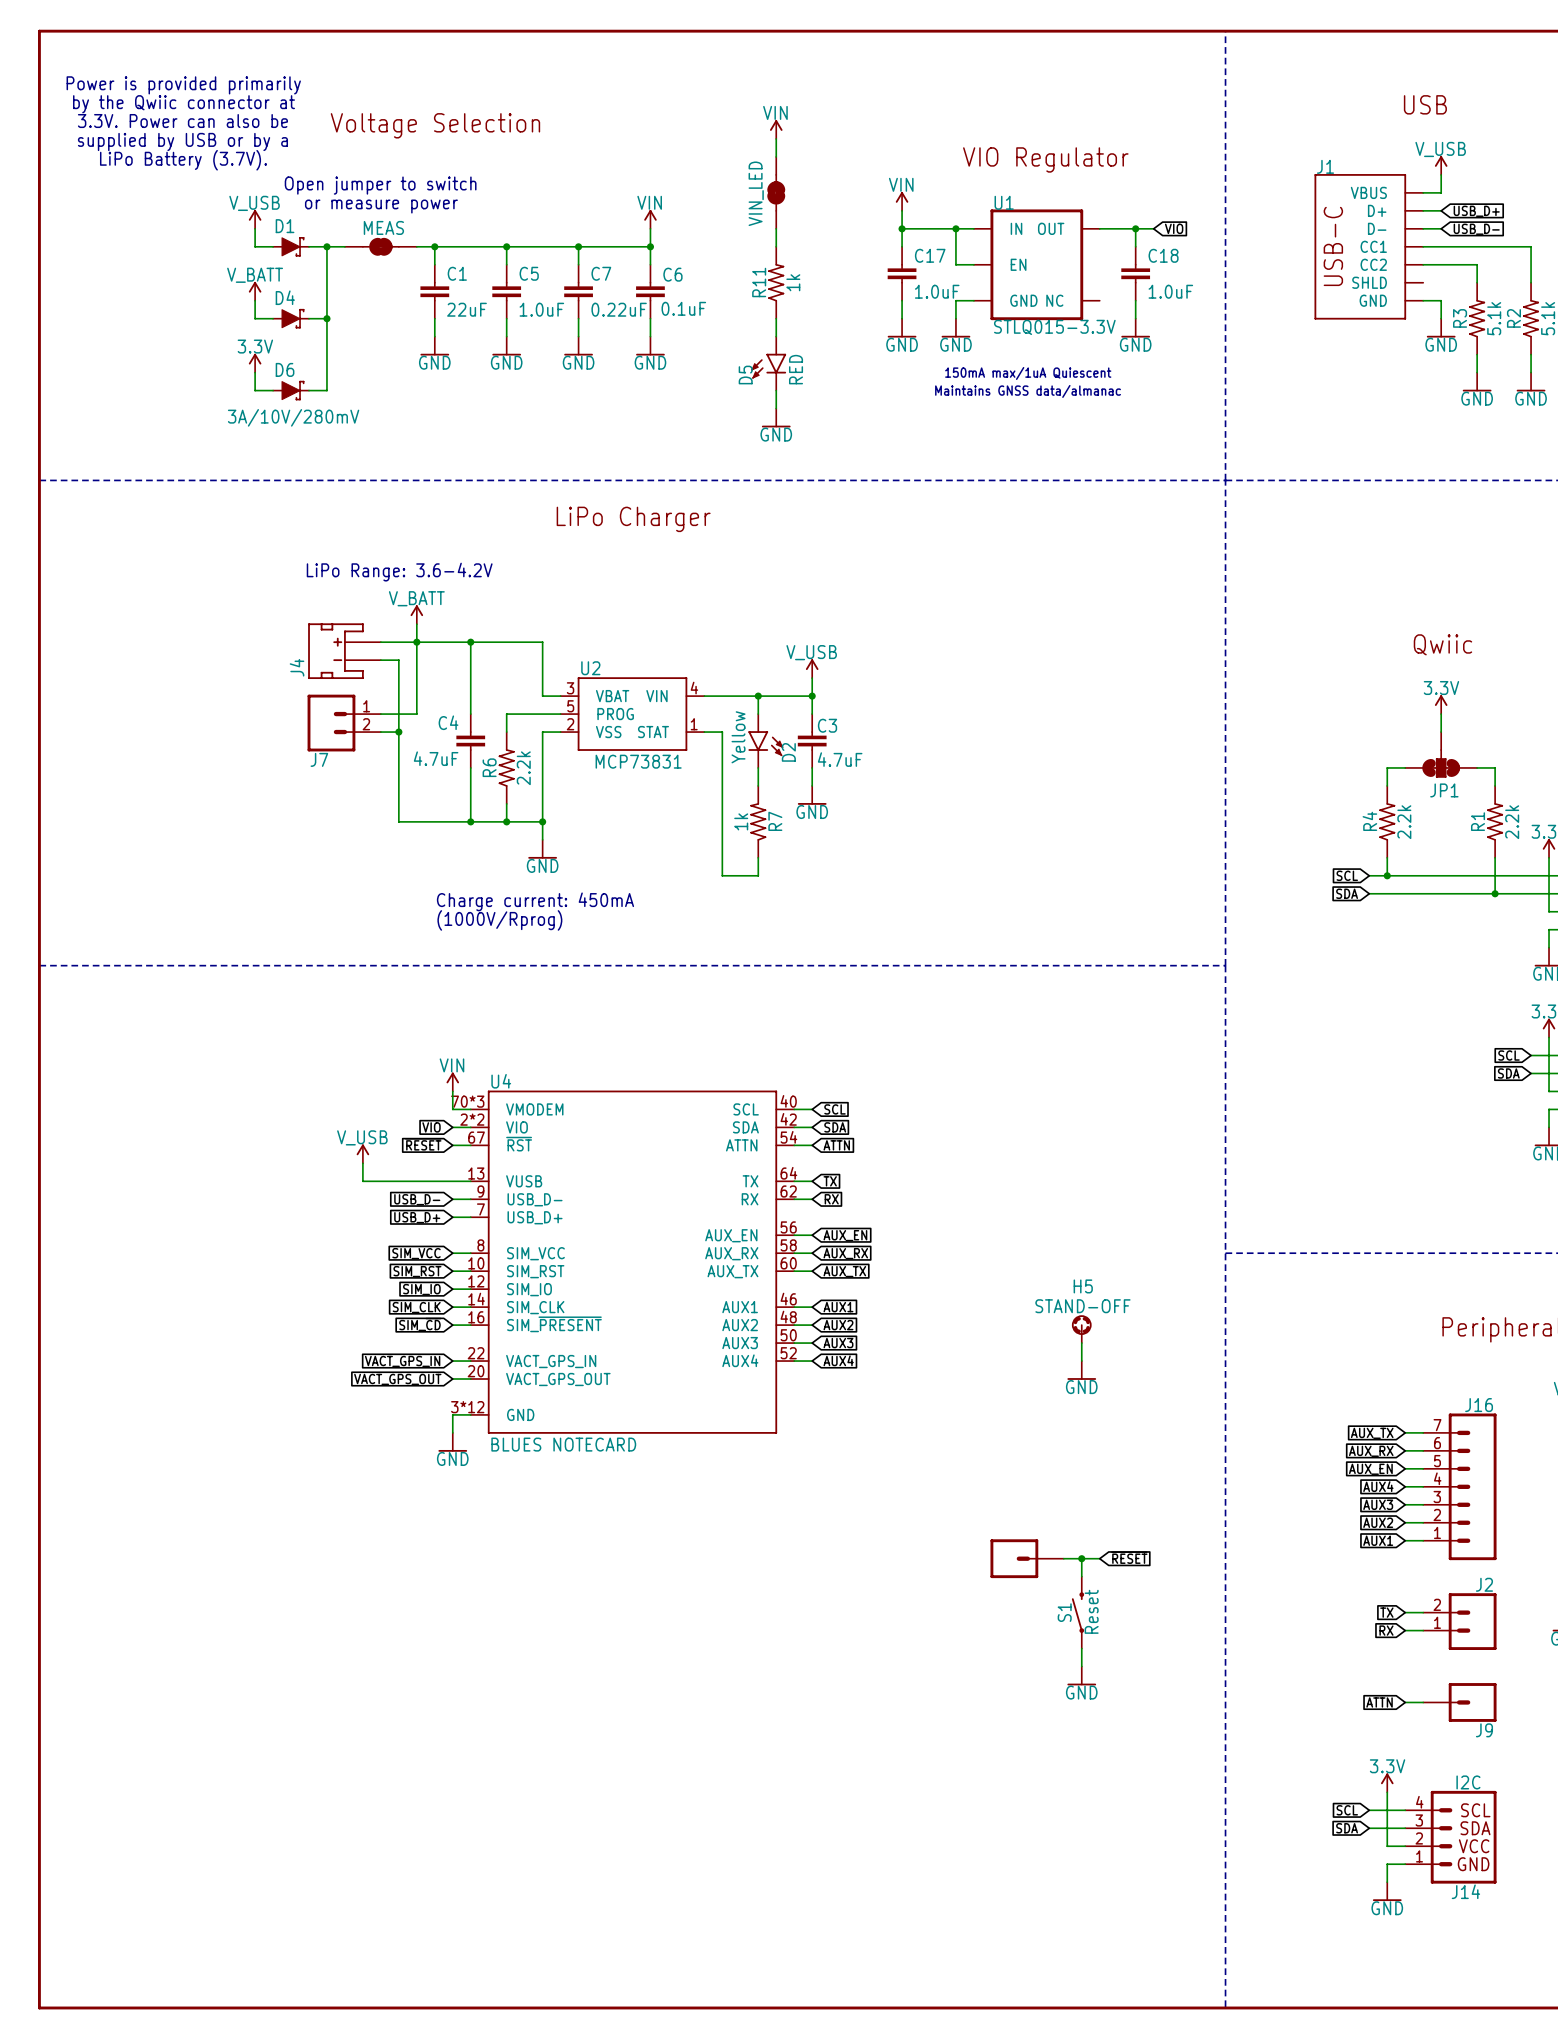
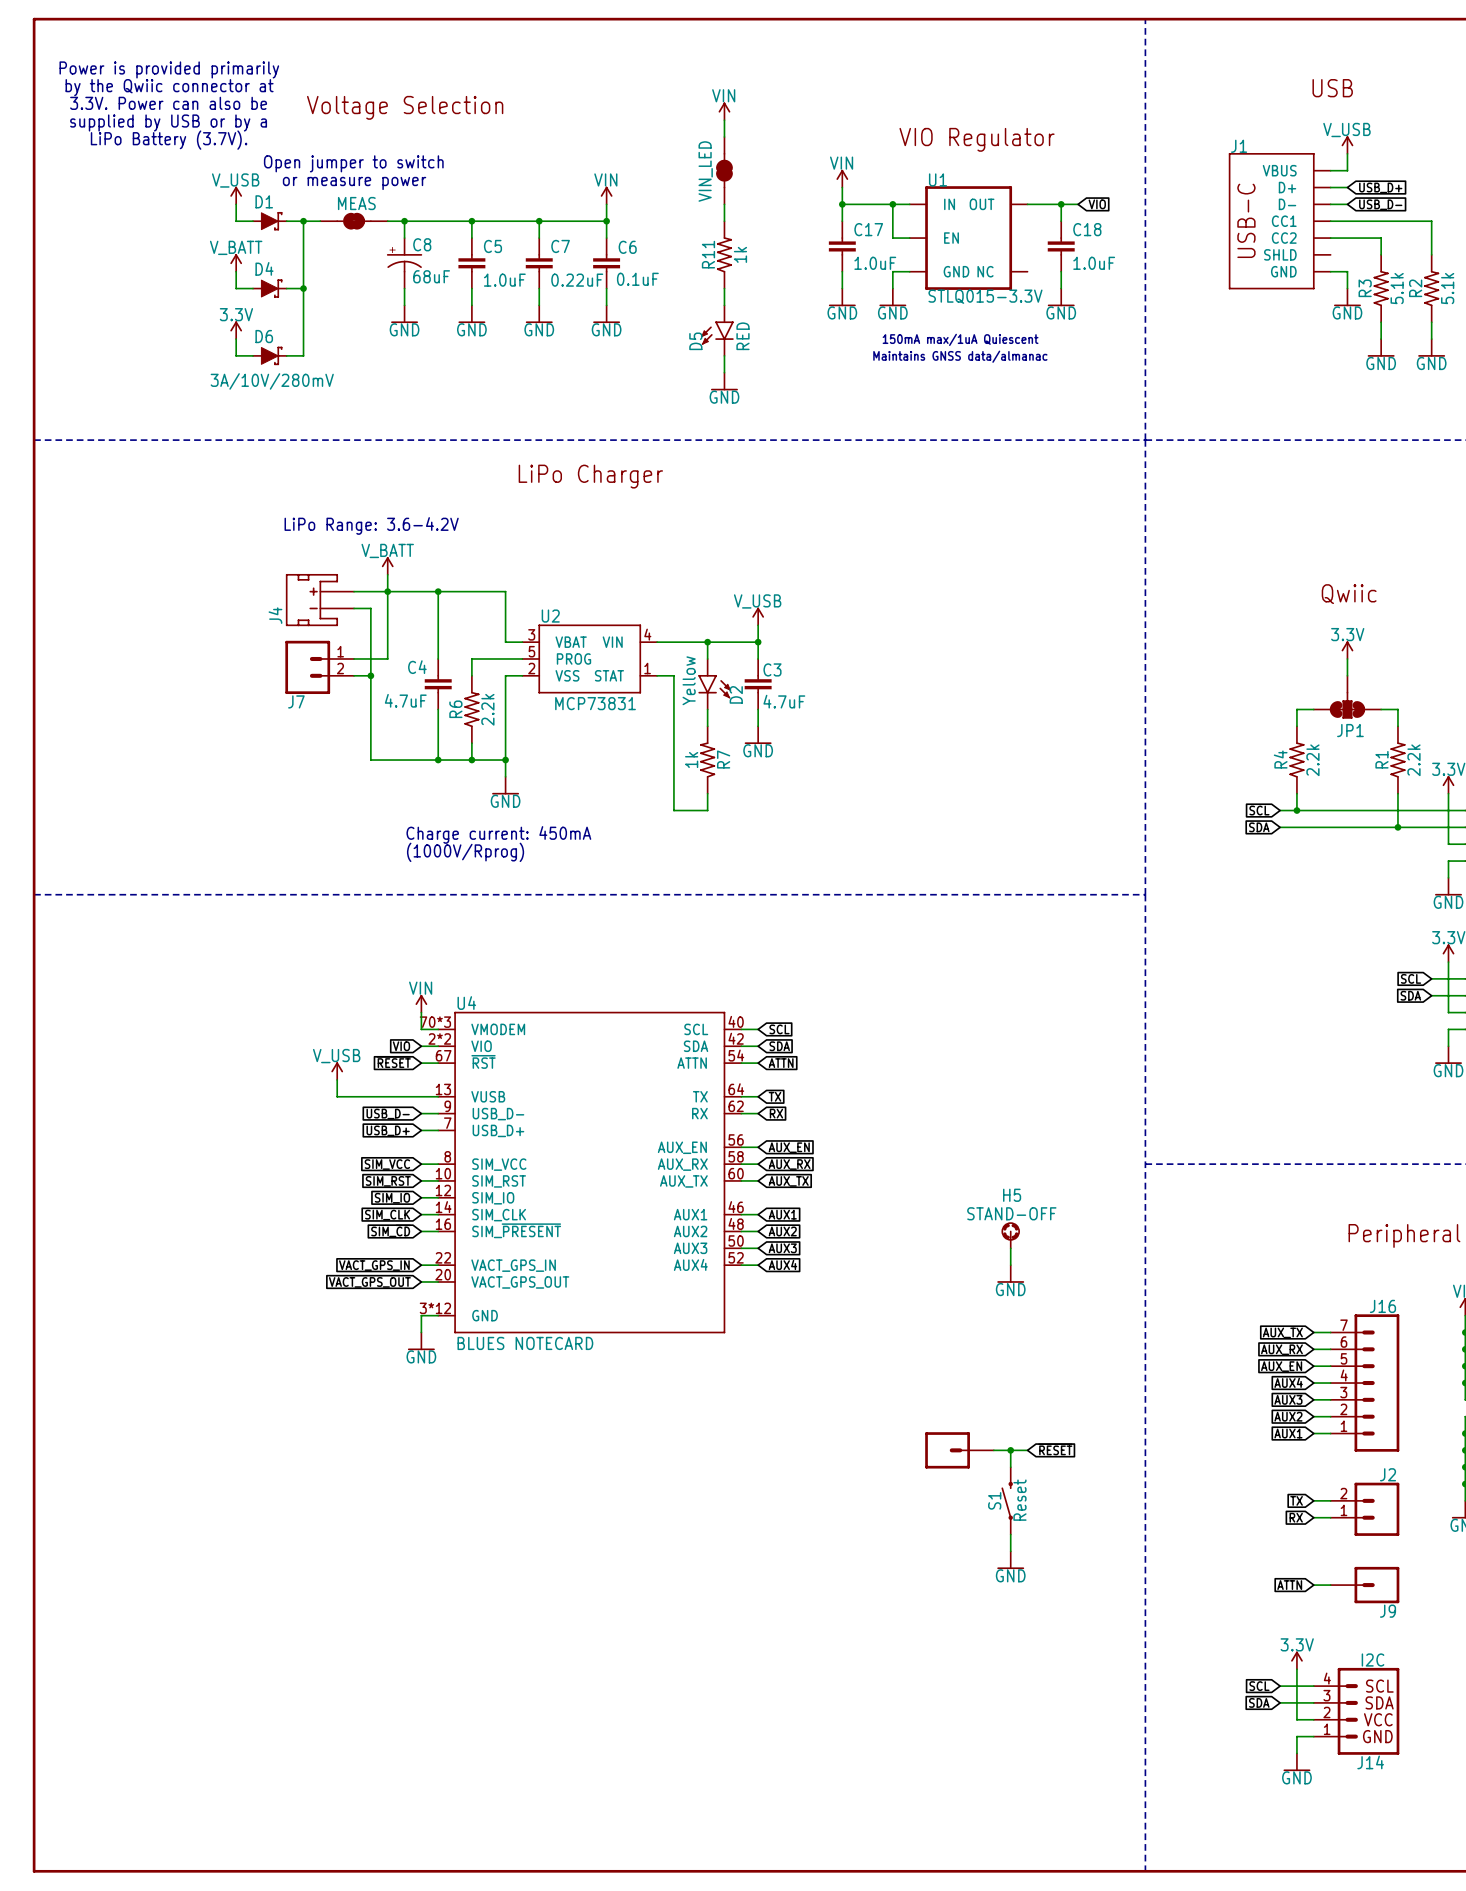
C1: 22uF (434, 291) -> none
C8: none -> 68uF (404, 263)

